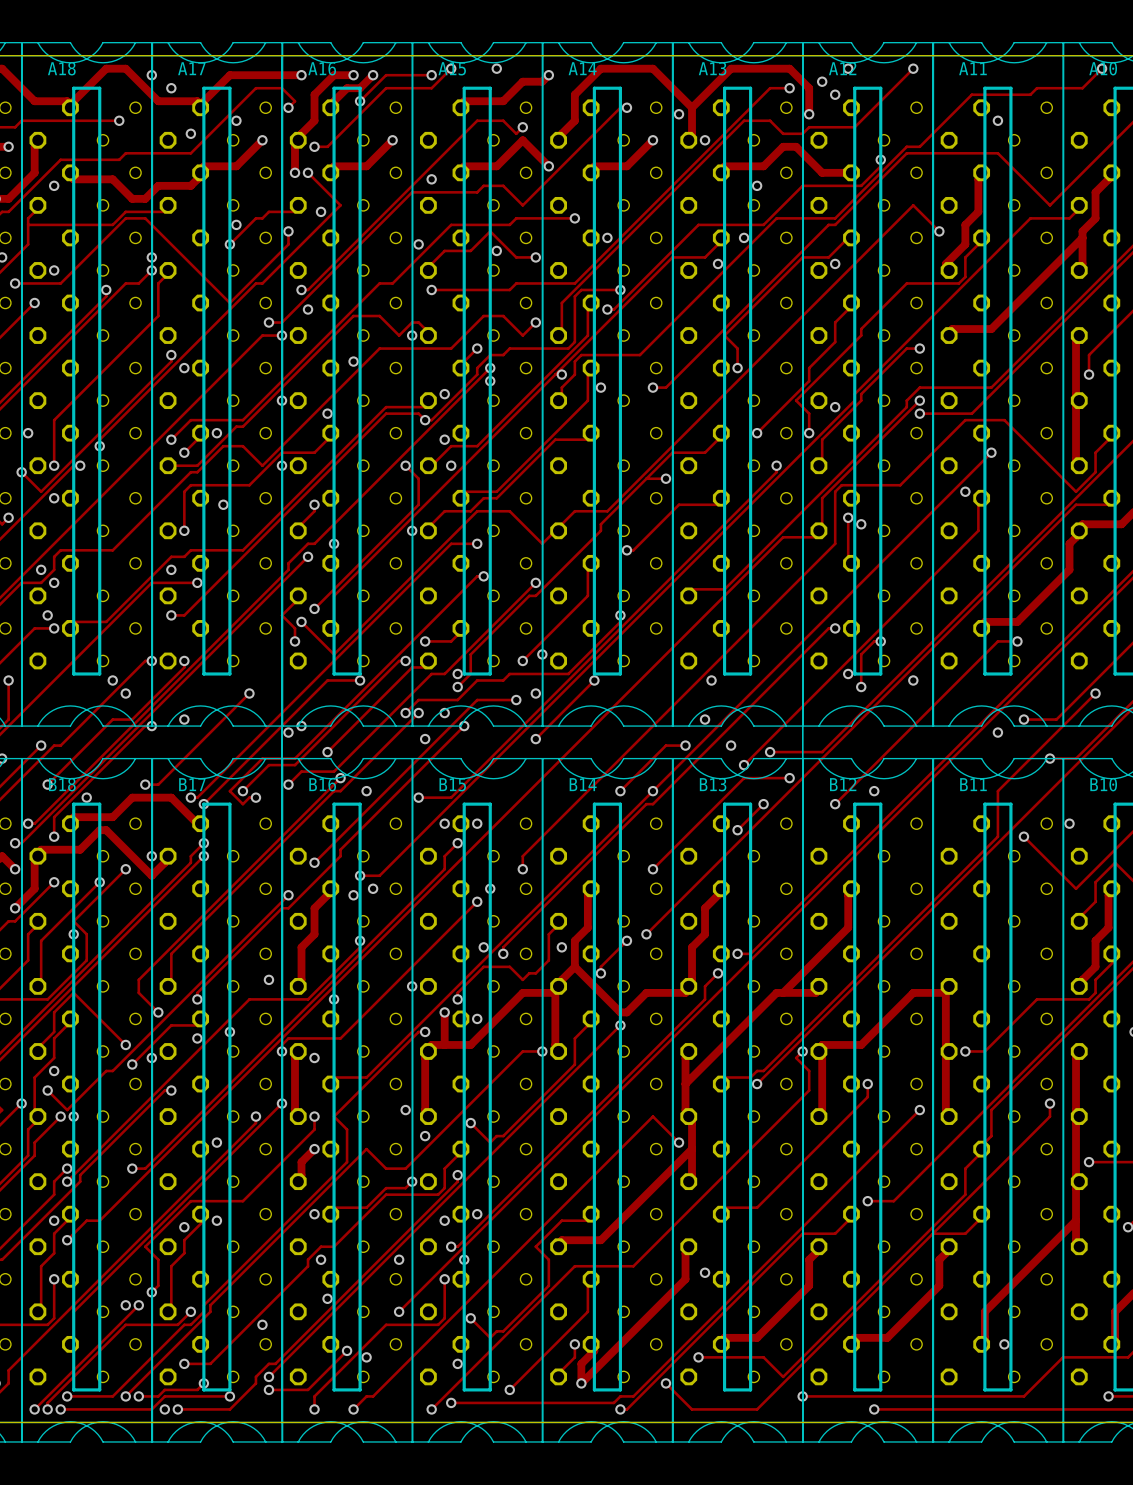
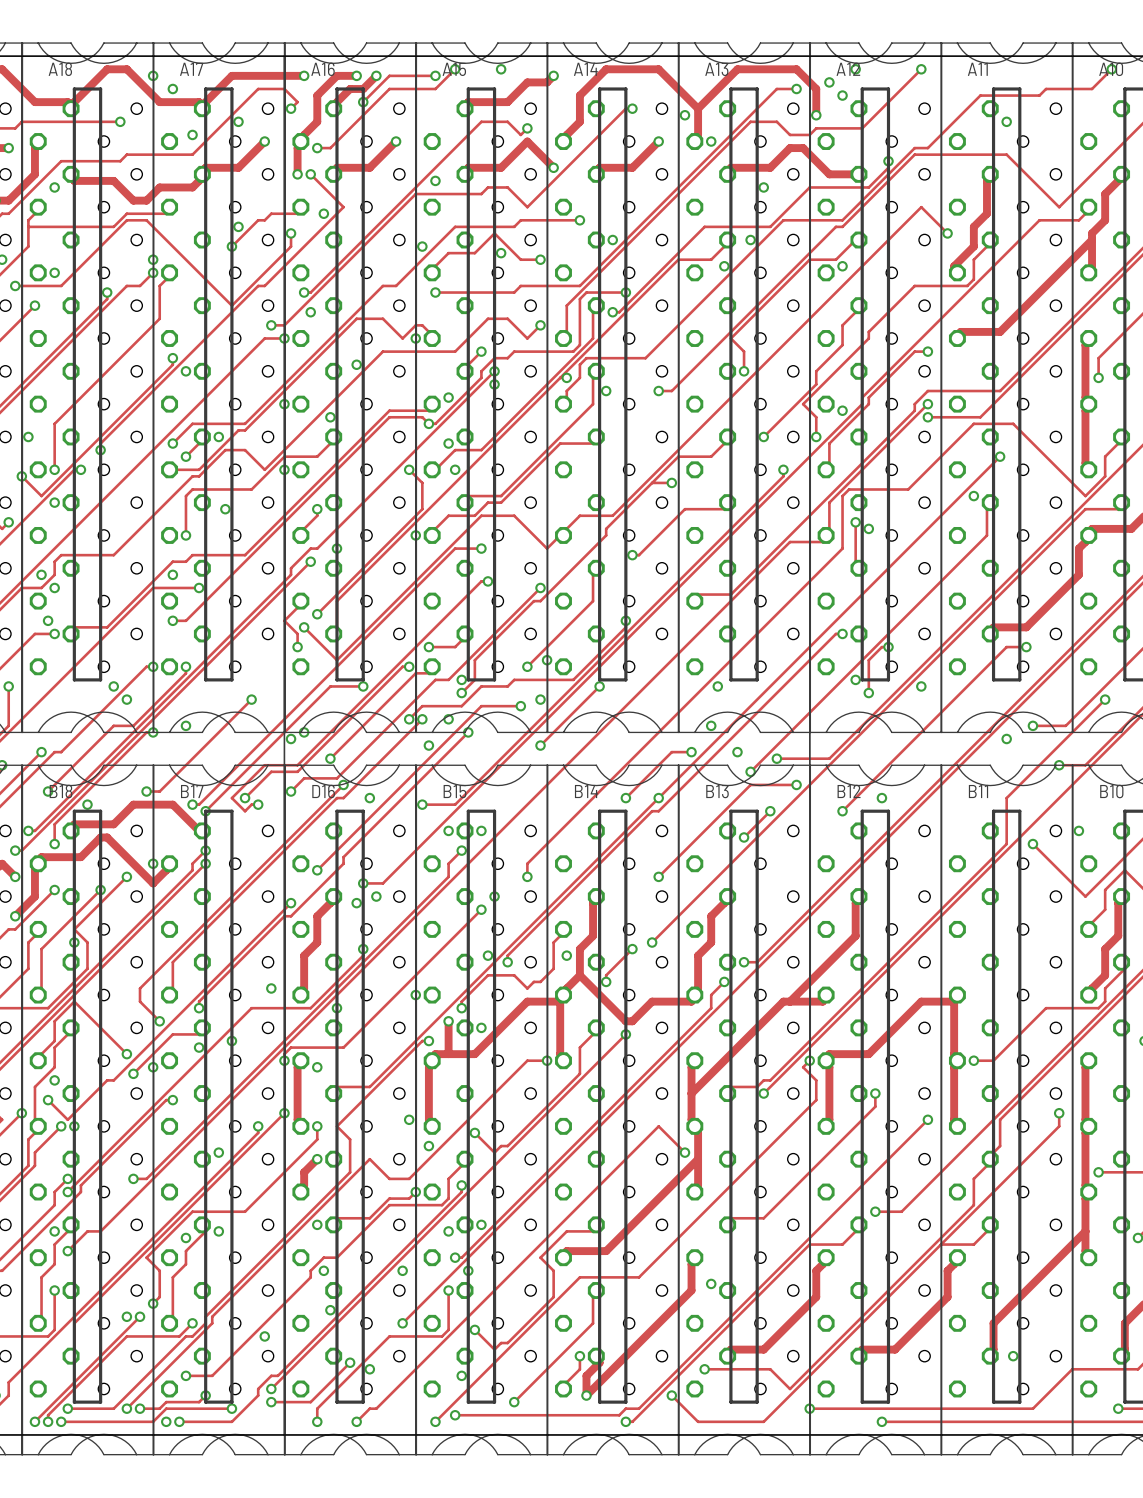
B16 name: B16 (322, 784) -> D16 (323, 791)

